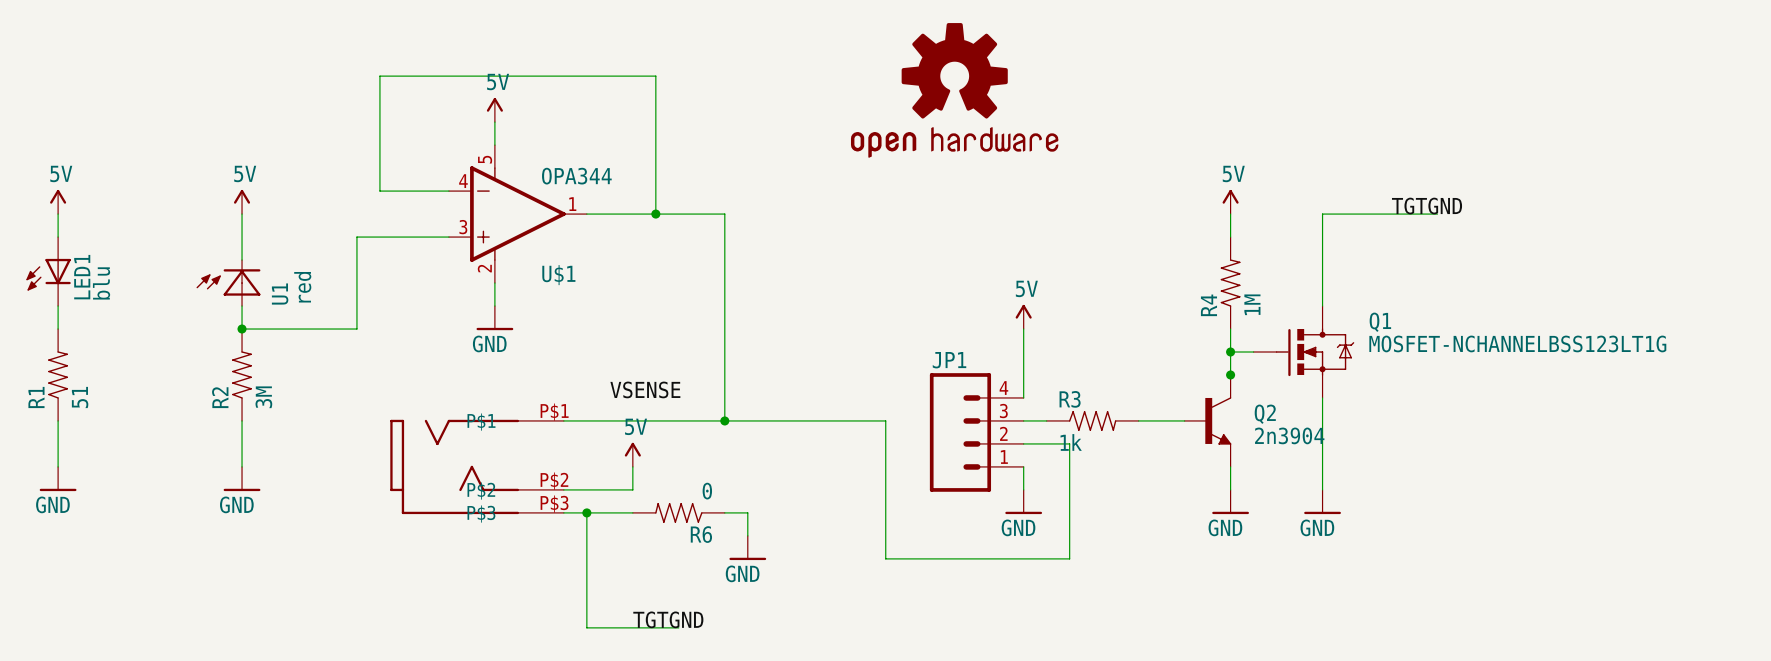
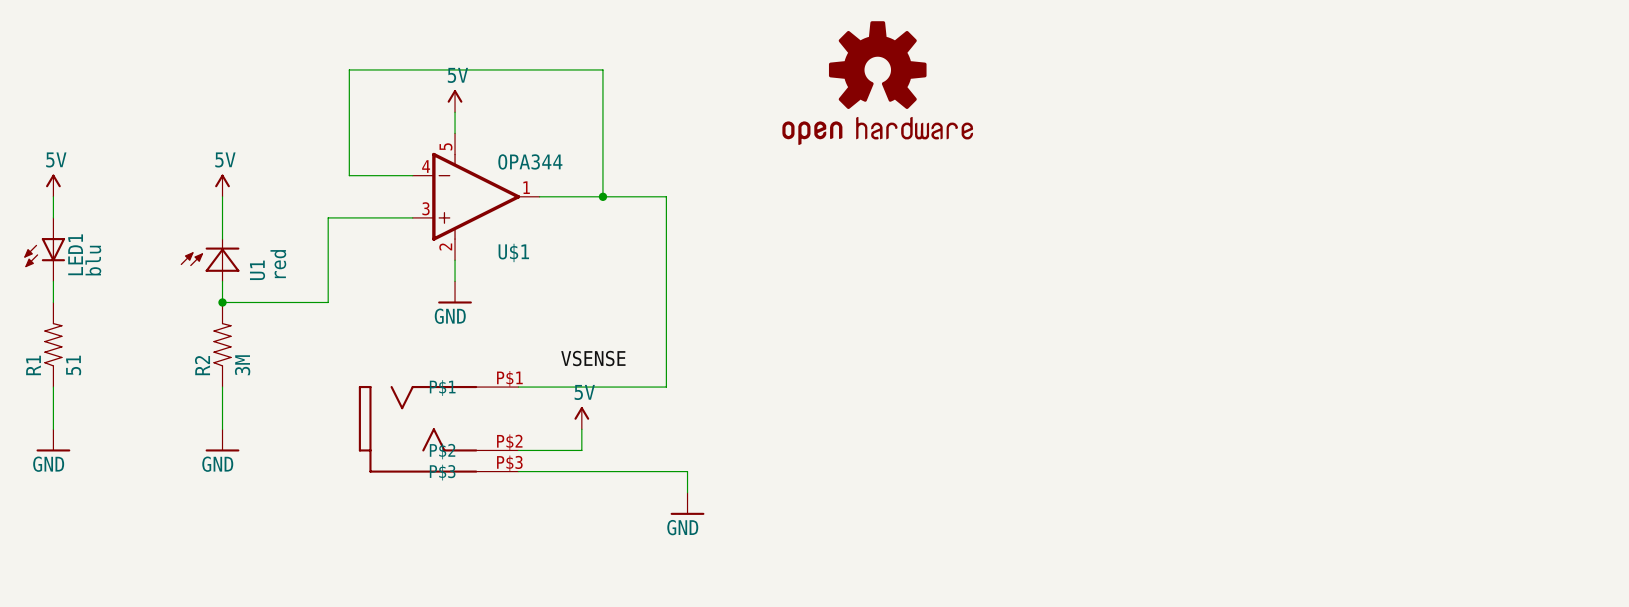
power symbol: 5V (1230, 201) -> none
label: TGTGND (1427, 206) -> none
wire: (1230, 214) (1230, 237) -> none
wire: (1437, 214) (1322, 214) (1322, 306) -> none
R4: 1M (1230, 283) -> none
power symbol: 5V (1023, 316) -> none
wire: (1023, 329) (1023, 397) -> none
wire: (1230, 329) (1230, 374) -> none
wire: (1230, 352) (1253, 352) -> none
junction: (1230, 352) -> none
Q1: MOSFET-NCHANNELBSS123LT1G (1303, 352) -> none
junction: (1230, 374) -> none
wire: (1322, 397) (1322, 489) -> none
wire: (724, 420) (885, 420) (885, 558) (1069, 558) (1069, 443) (1023, 443) -> none
junction: (724, 420) -> none
wire: (1023, 420) (1046, 420) -> none
R3: 1k (1092, 420) -> none
wire: (1138, 420) (1184, 420) -> none
Q2: 2n3904 (1207, 420) -> none
JP1: (976, 432) -> none
wire: (1023, 466) (1023, 489) -> none
wire: (1230, 466) (1230, 489) -> none
power symbol: GND (1023, 502) -> none
power symbol: GND (1230, 502) -> none
power symbol: GND (1322, 502) -> none
wire: (586, 512) (586, 627) (678, 627) -> none
junction: (586, 512) -> none
R6: 0 (678, 512) -> none
label: TGTGND (668, 619) -> none

